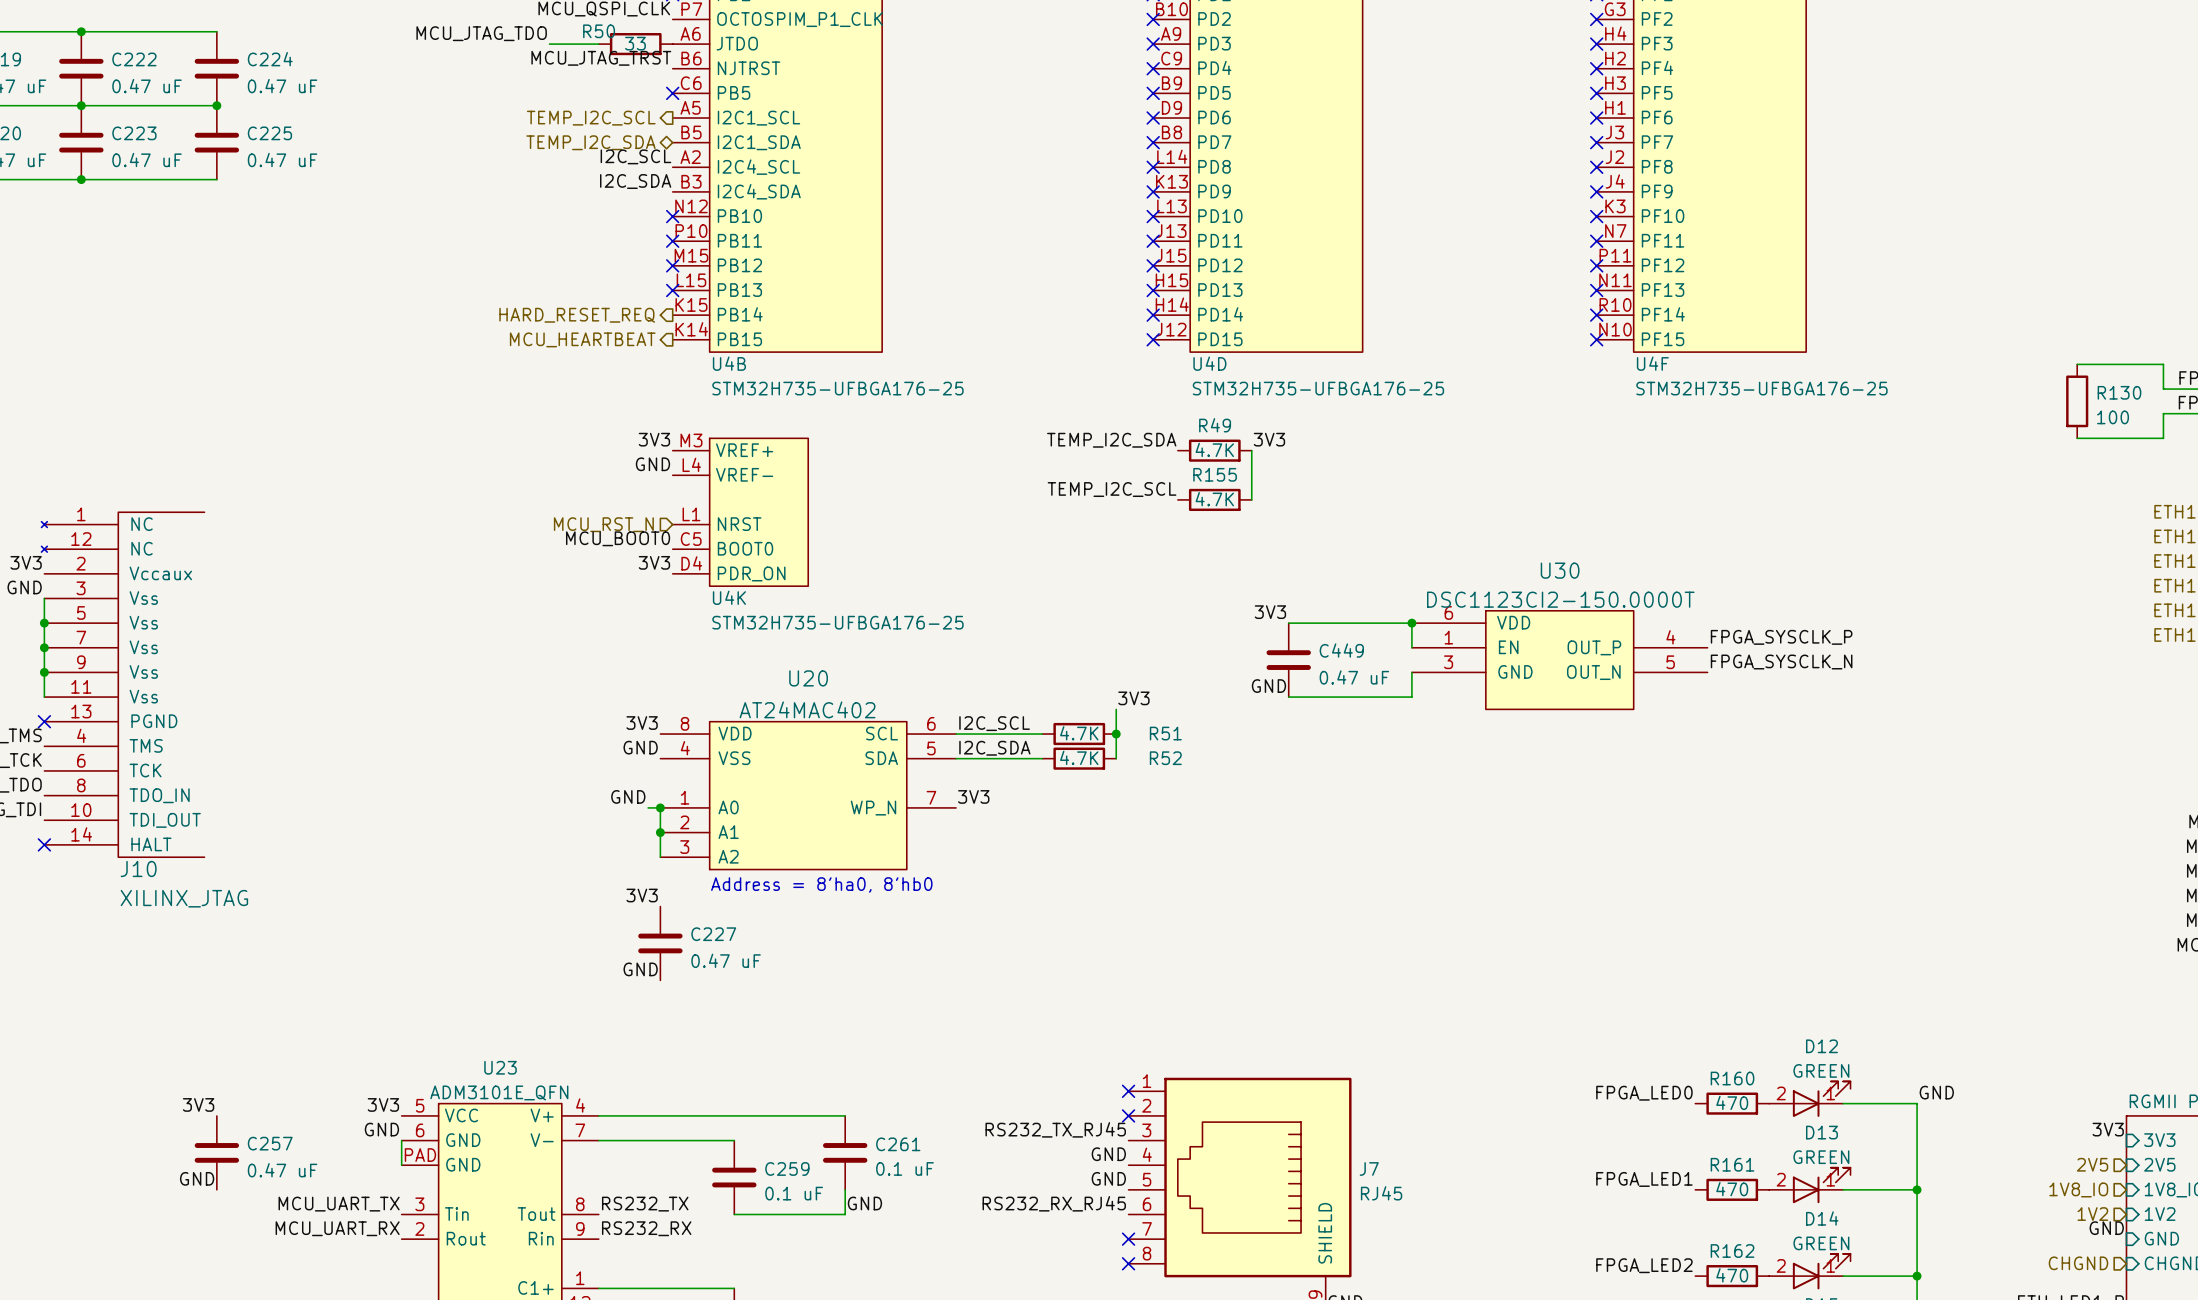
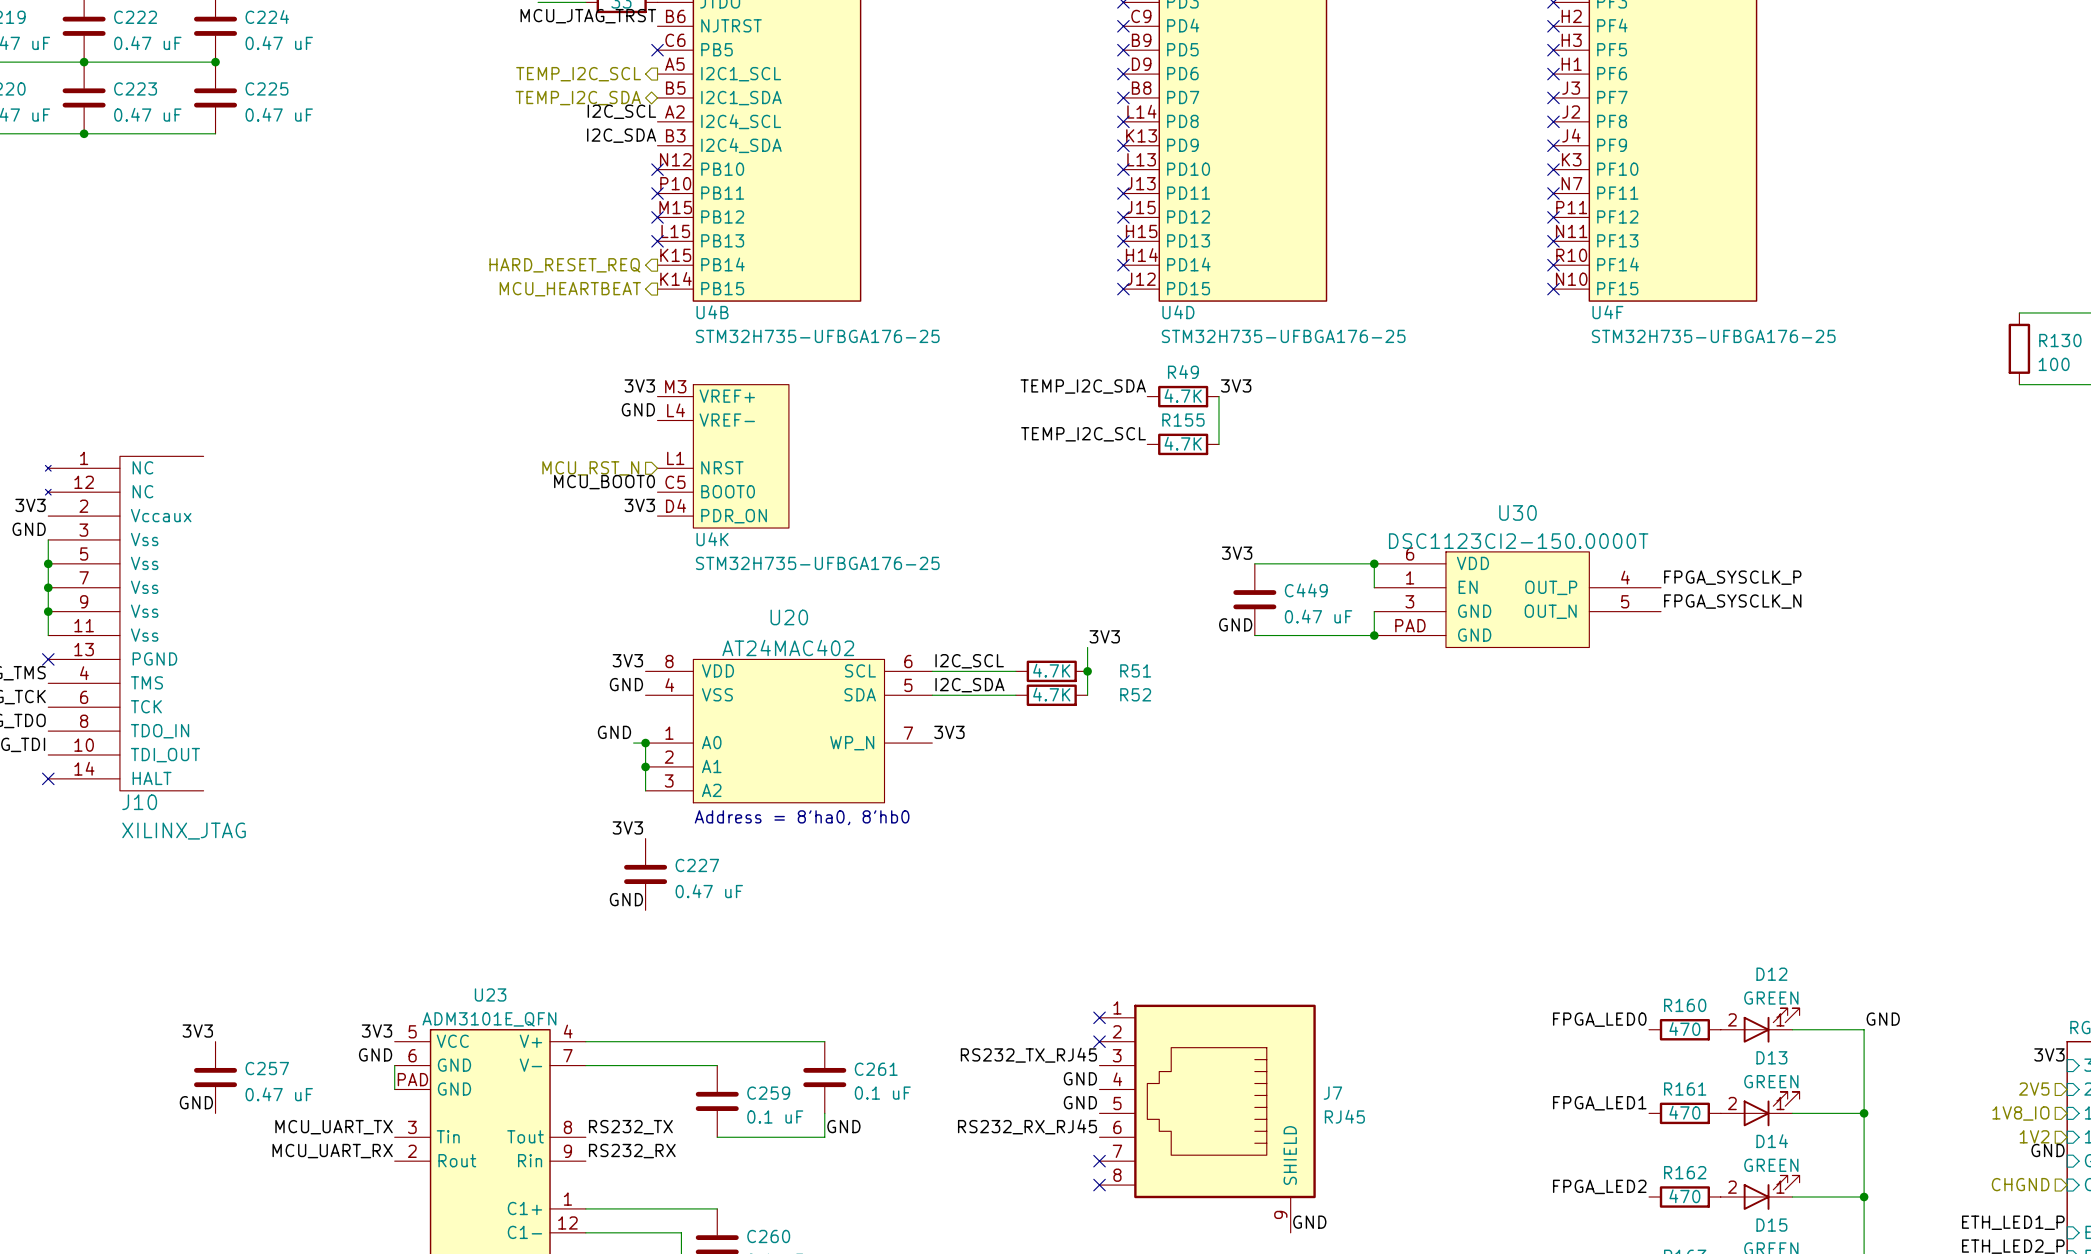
U30 symbol: [1411, 610, 1708, 710] -> [1374, 551, 1662, 648]
junction: none -> (1374, 635)

